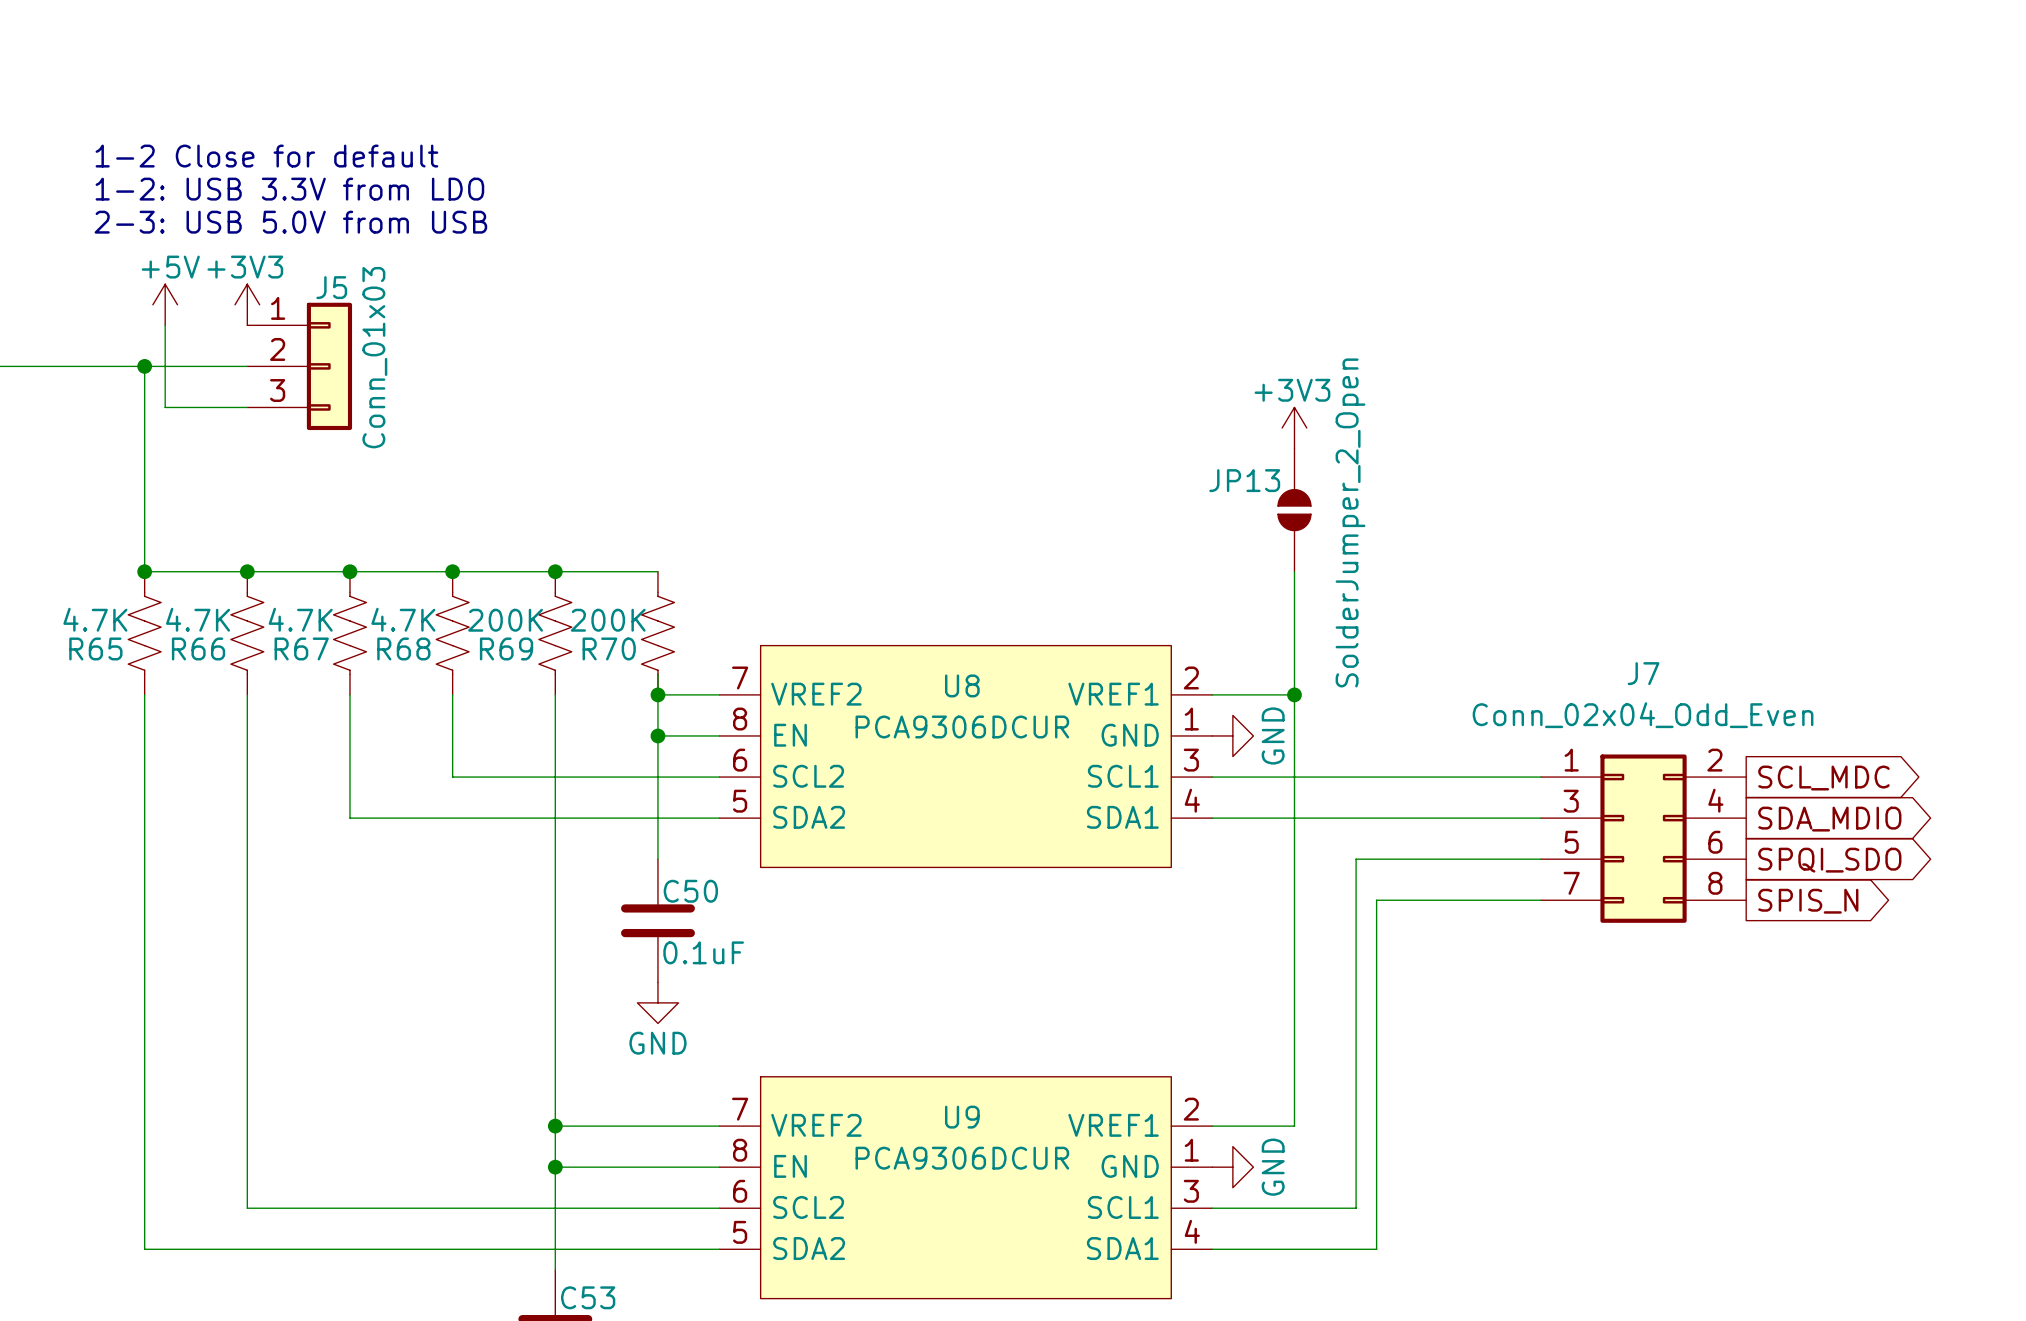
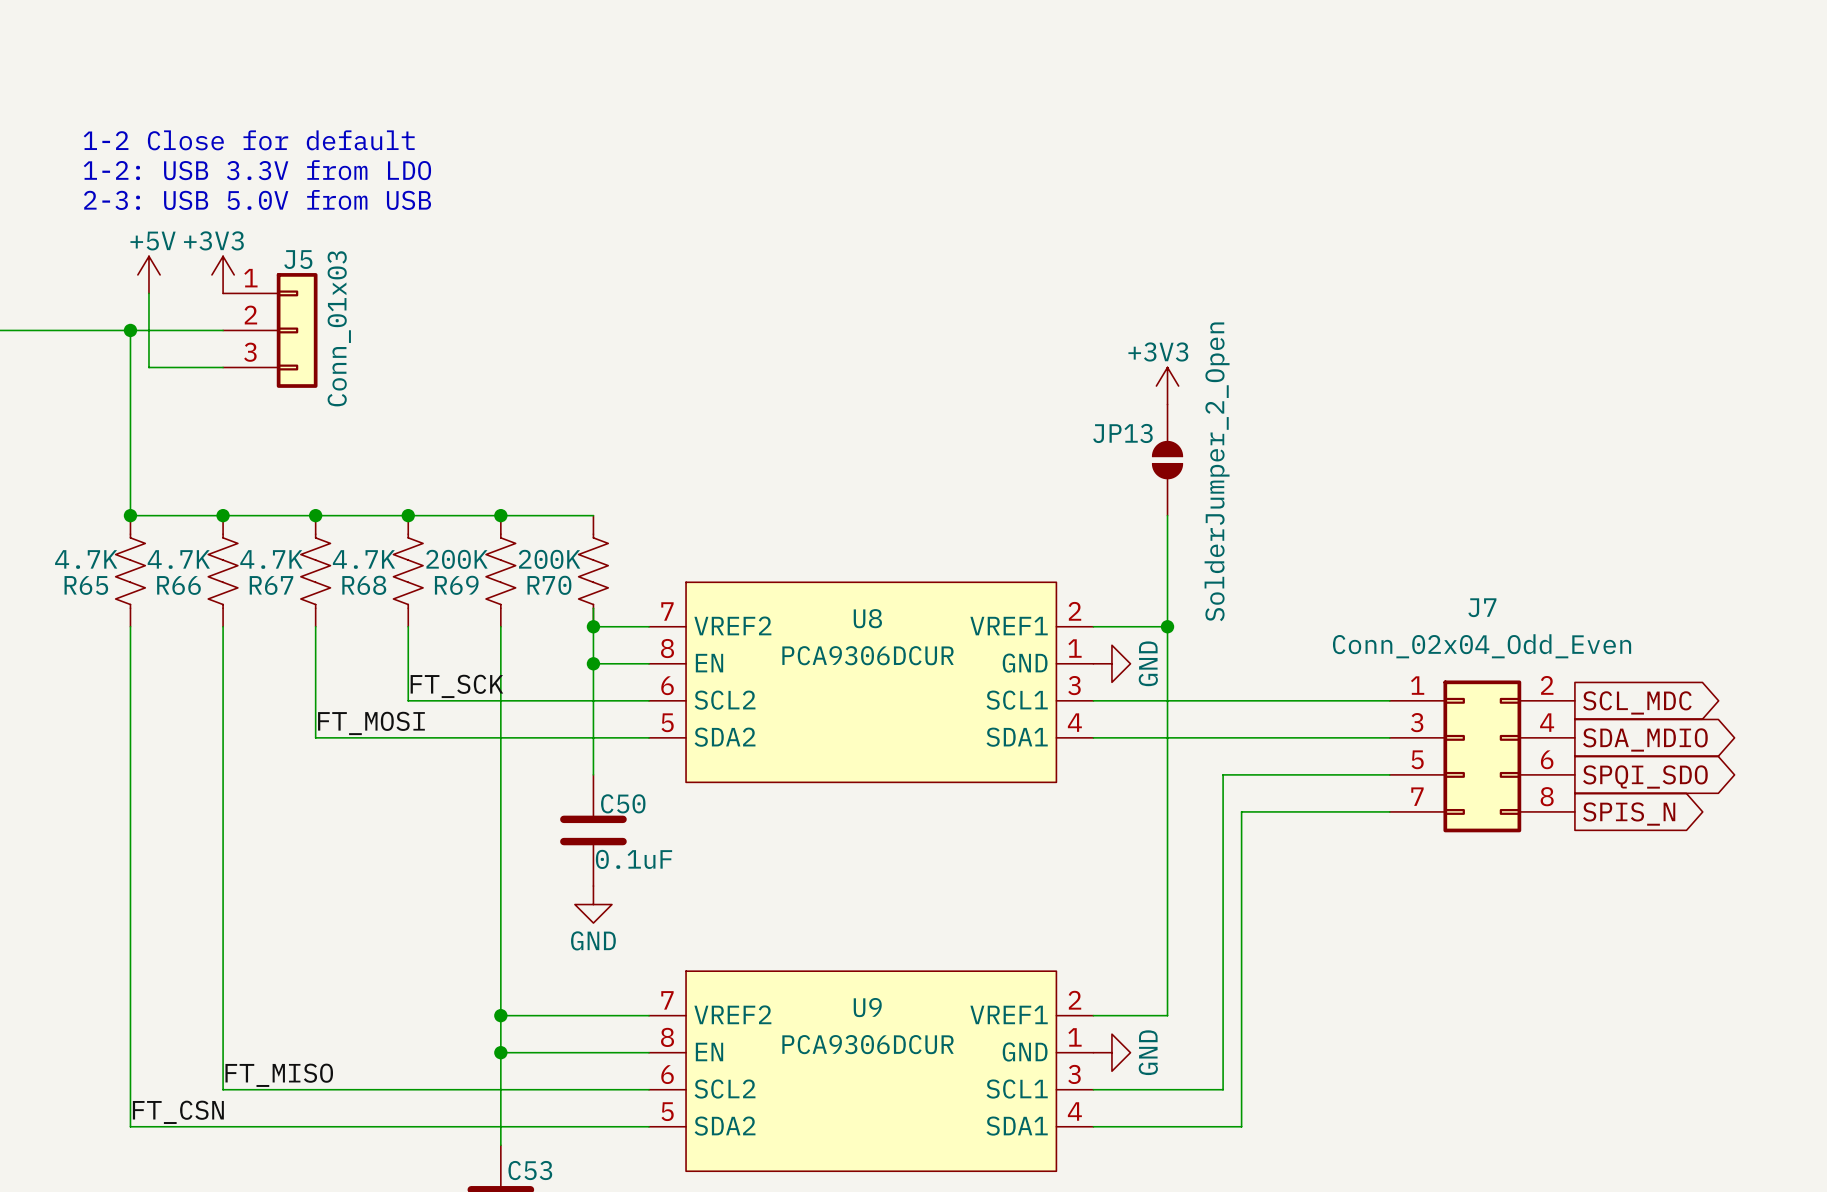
label: none -> FT_SCK (456, 686)
label: none -> FT_MOSI (371, 723)
label: none -> FT_MISO (279, 1075)
label: none -> FT_CSN (178, 1112)

